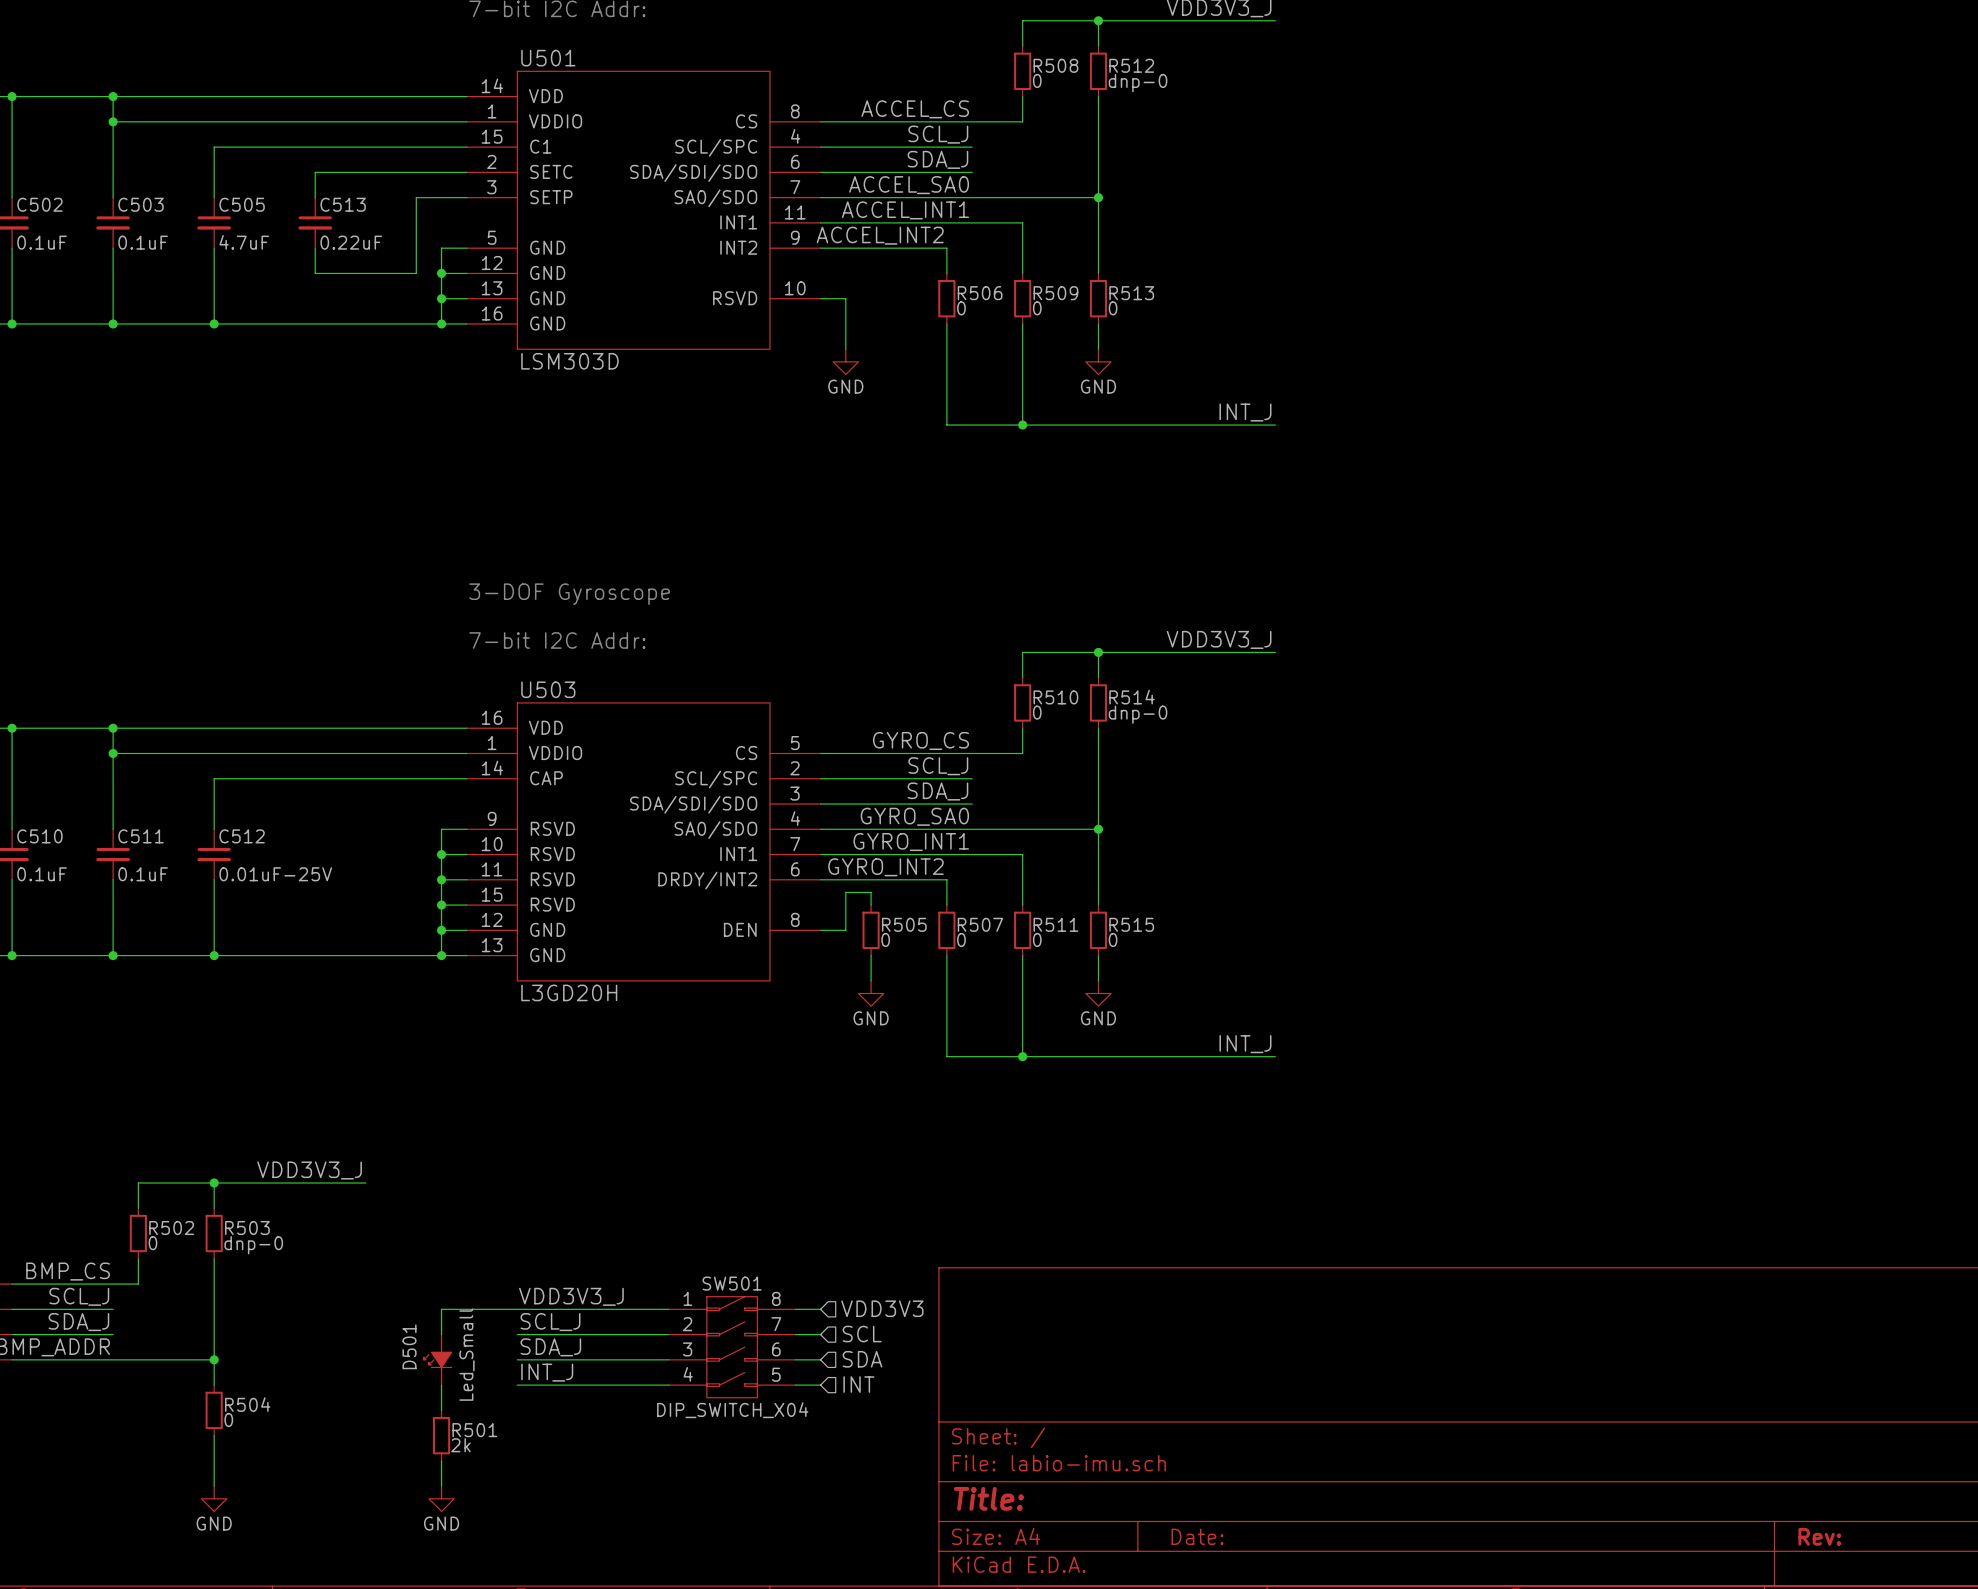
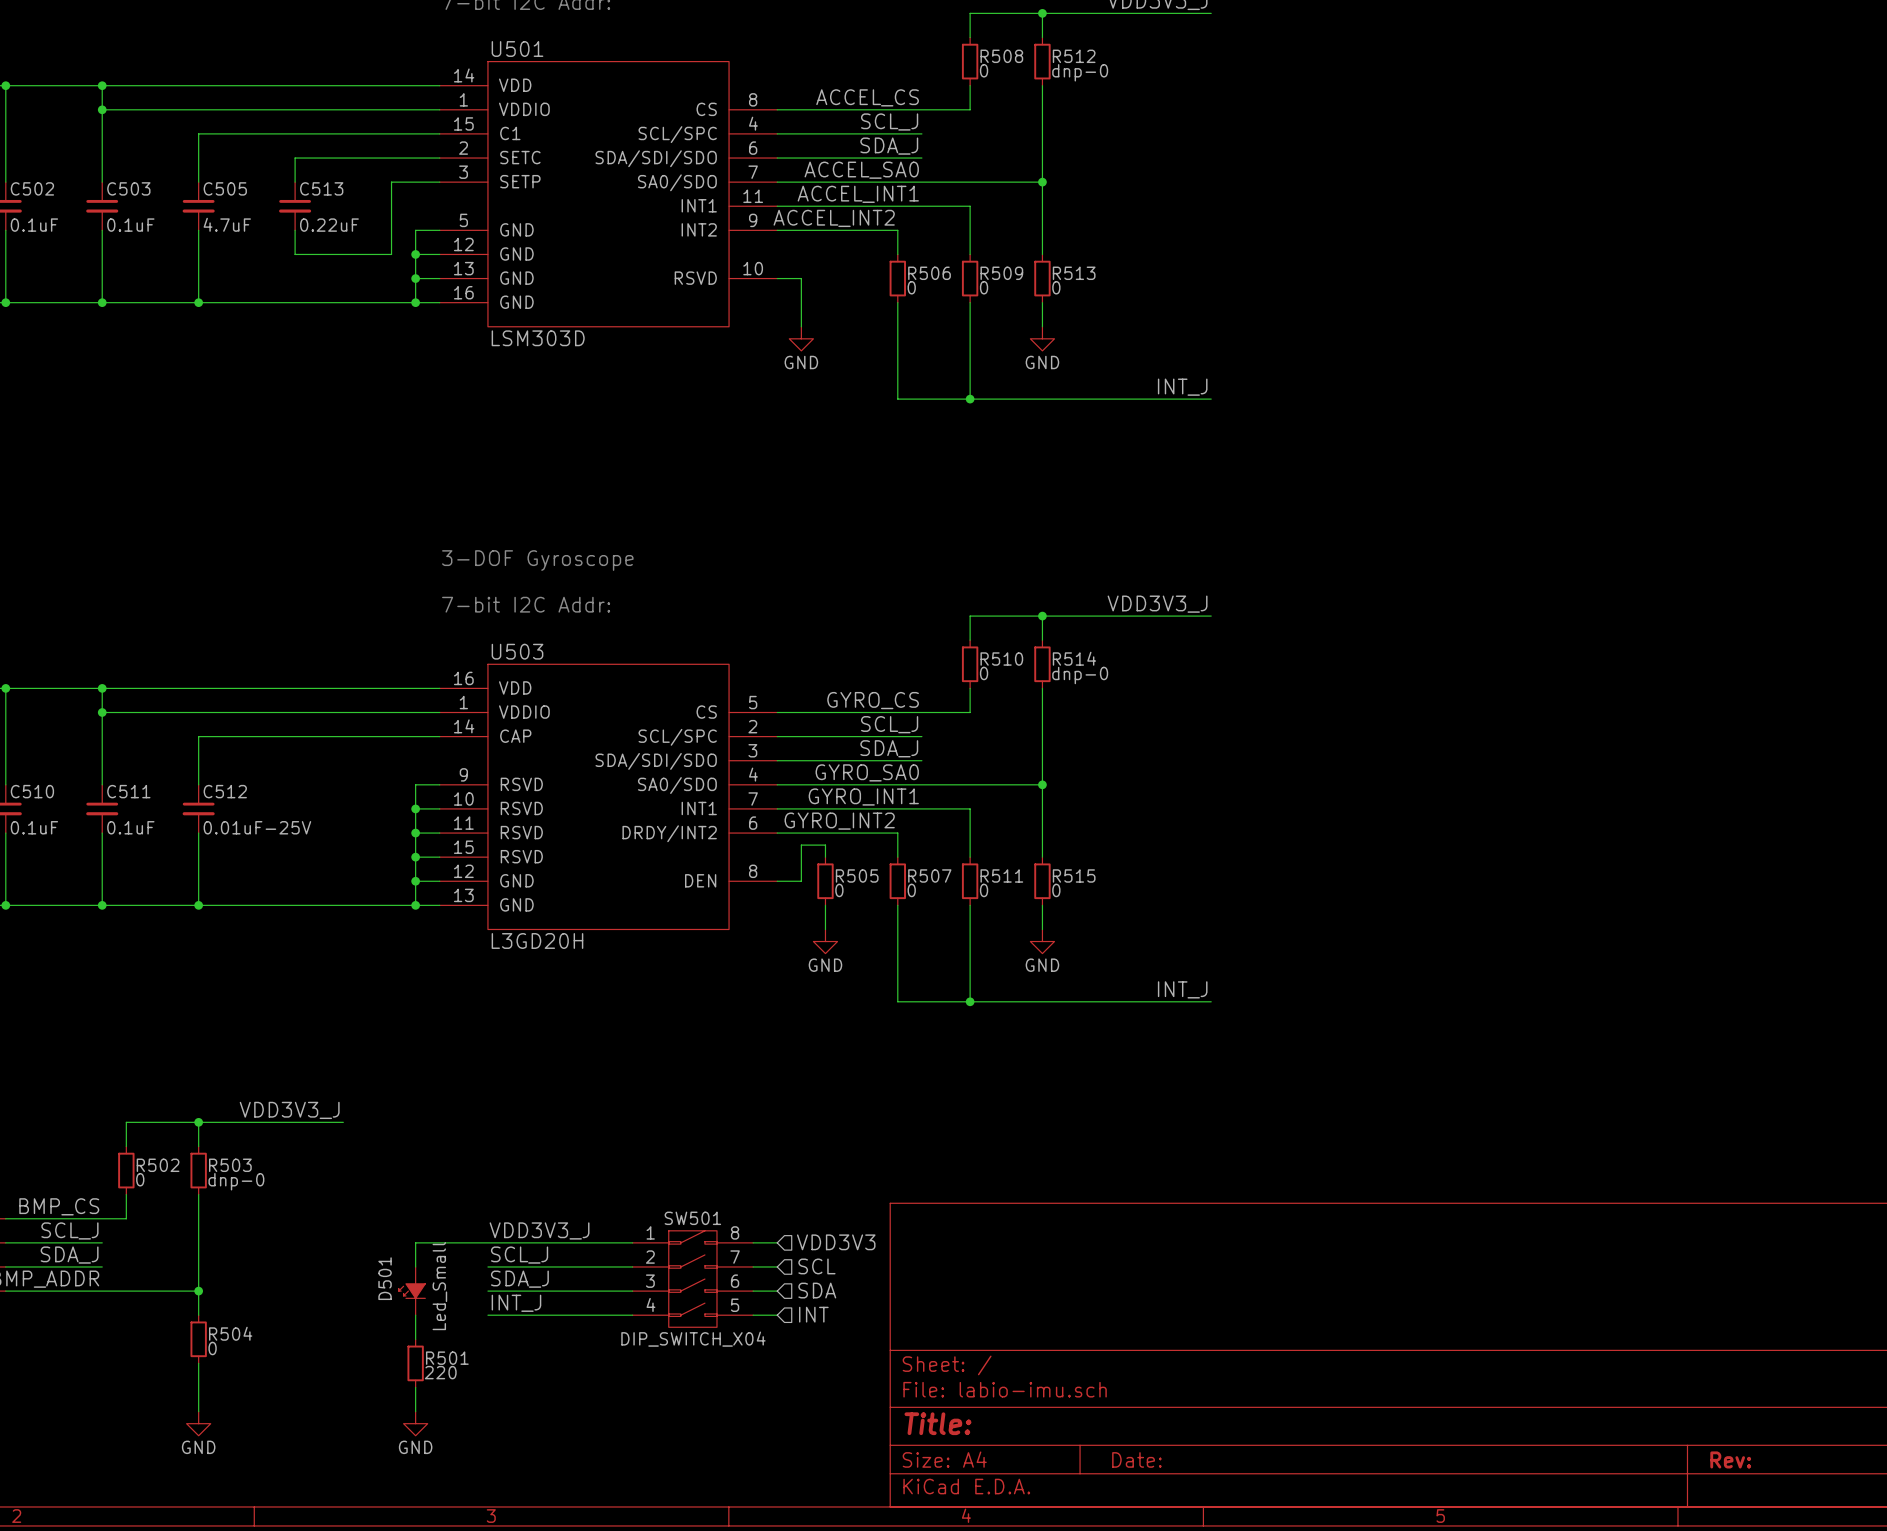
R501 value: 2k (460, 1445) -> 220 (440, 1372)

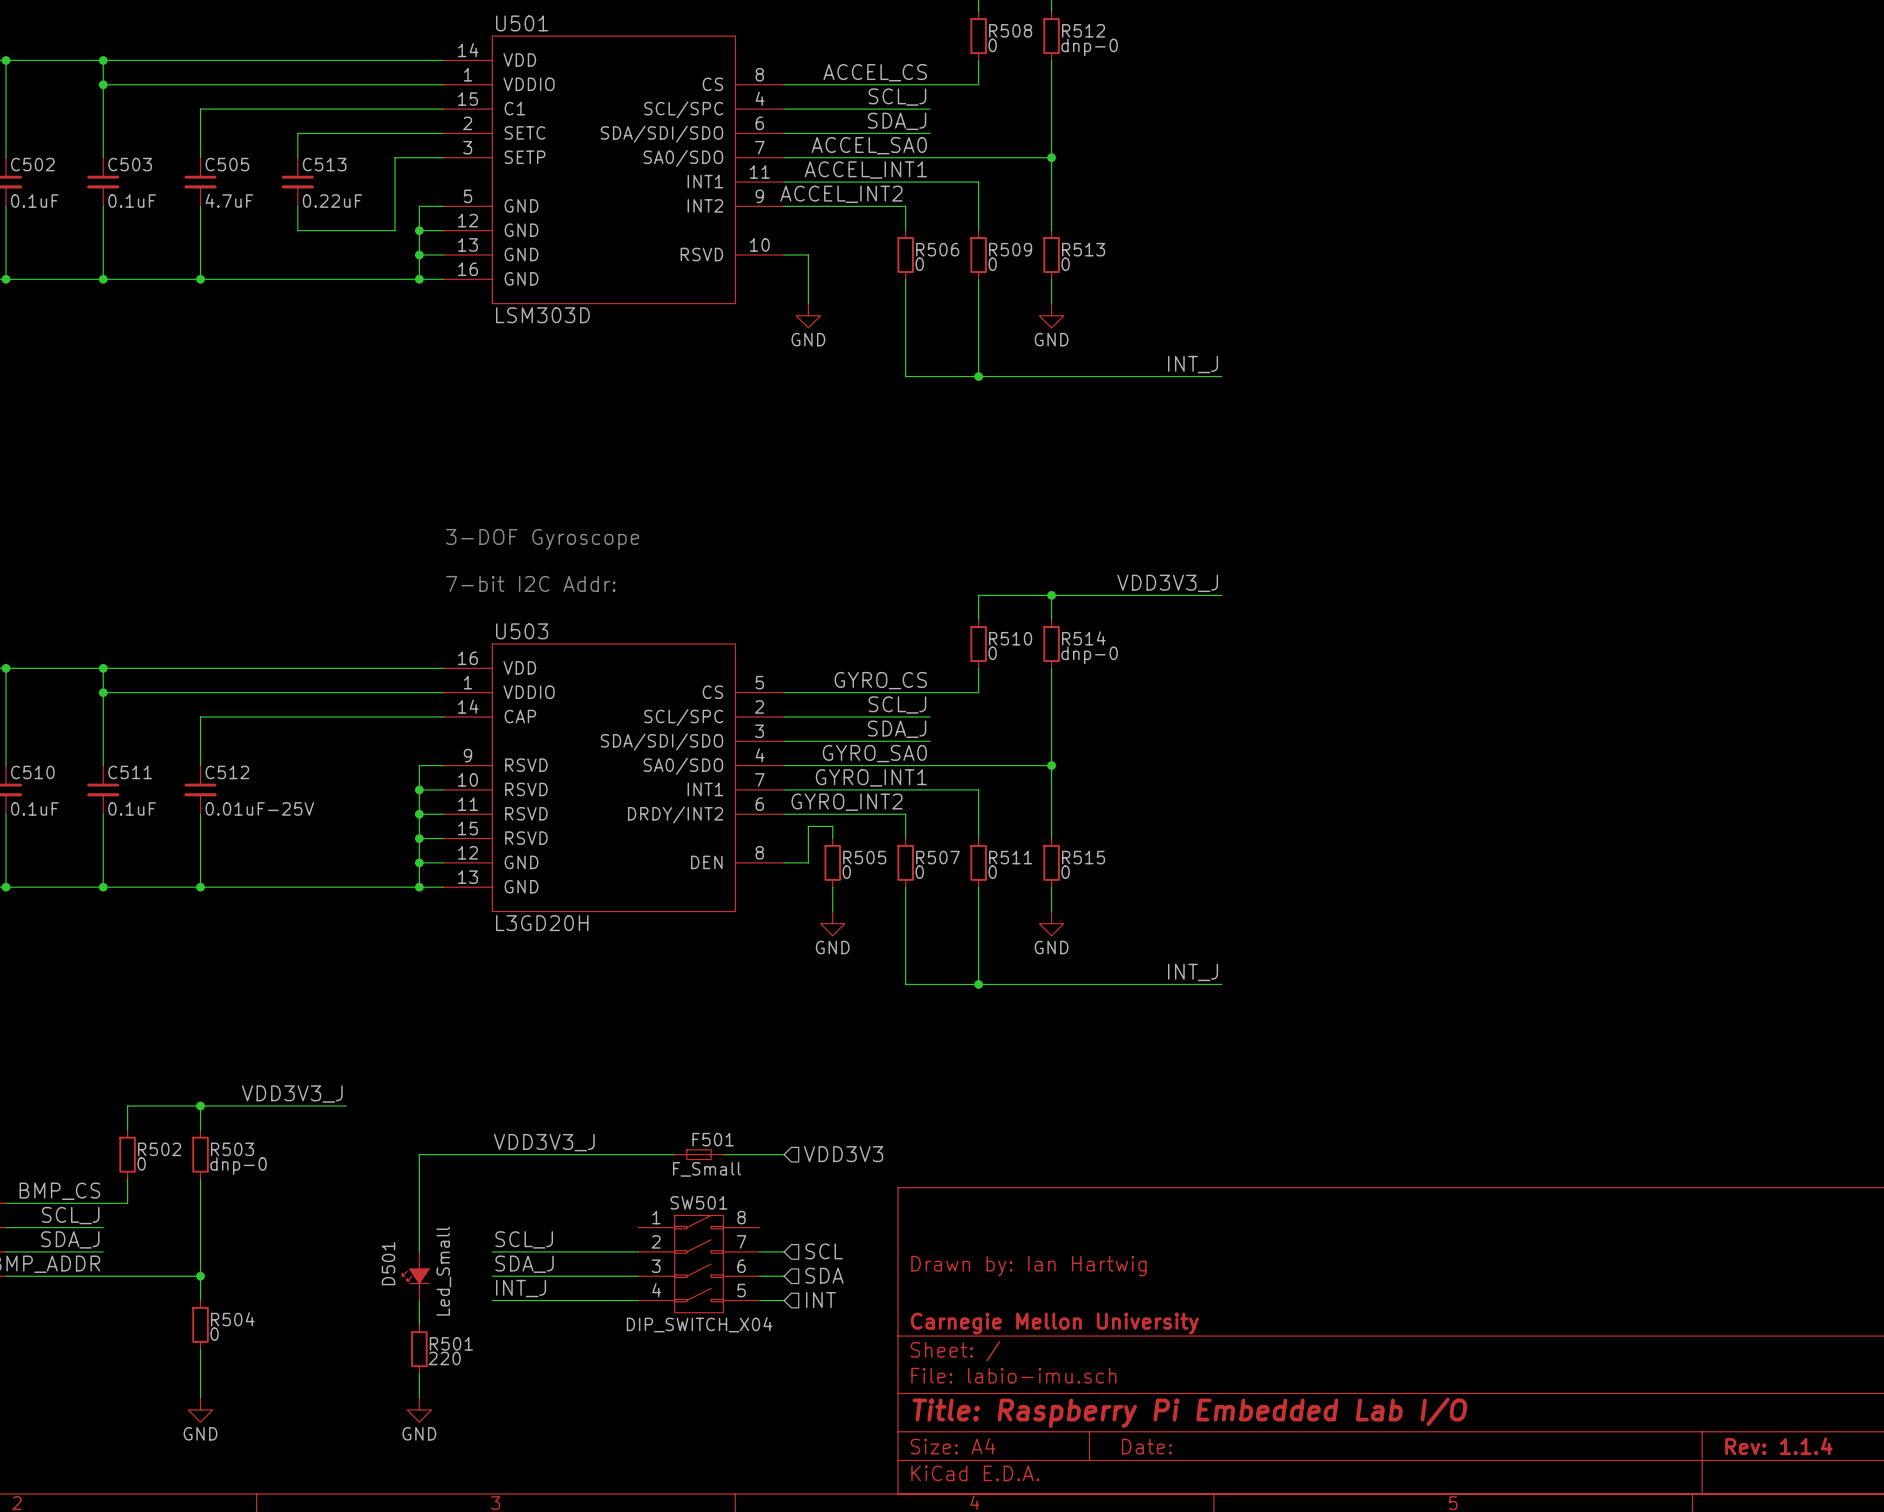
F501: none -> F_Small (698, 1154)
wire: none -> (723, 1154) (784, 1154)
label position: VDD3V3_J (539, 1230) -> VDD3V3_J (544, 1142)
wire: (415, 1242) (632, 1242) -> (419, 1227) (419, 1154) (674, 1154)
wire: (753, 1242) (777, 1242) -> none
hierarchical label position: VDD3V3 (836, 1242) -> VDD3V3 (843, 1154)
title block: none -> Drawn by: Ian Hartwig (1028, 1266)
title block: none -> Carnegie Mellon University (1054, 1323)
title block: Title: (937, 1423) -> Title: Raspberry Pi Embedded Lab I/O (1189, 1412)
title block: Rev: (1730, 1459) -> Rev: 1.1.4 (1778, 1446)

